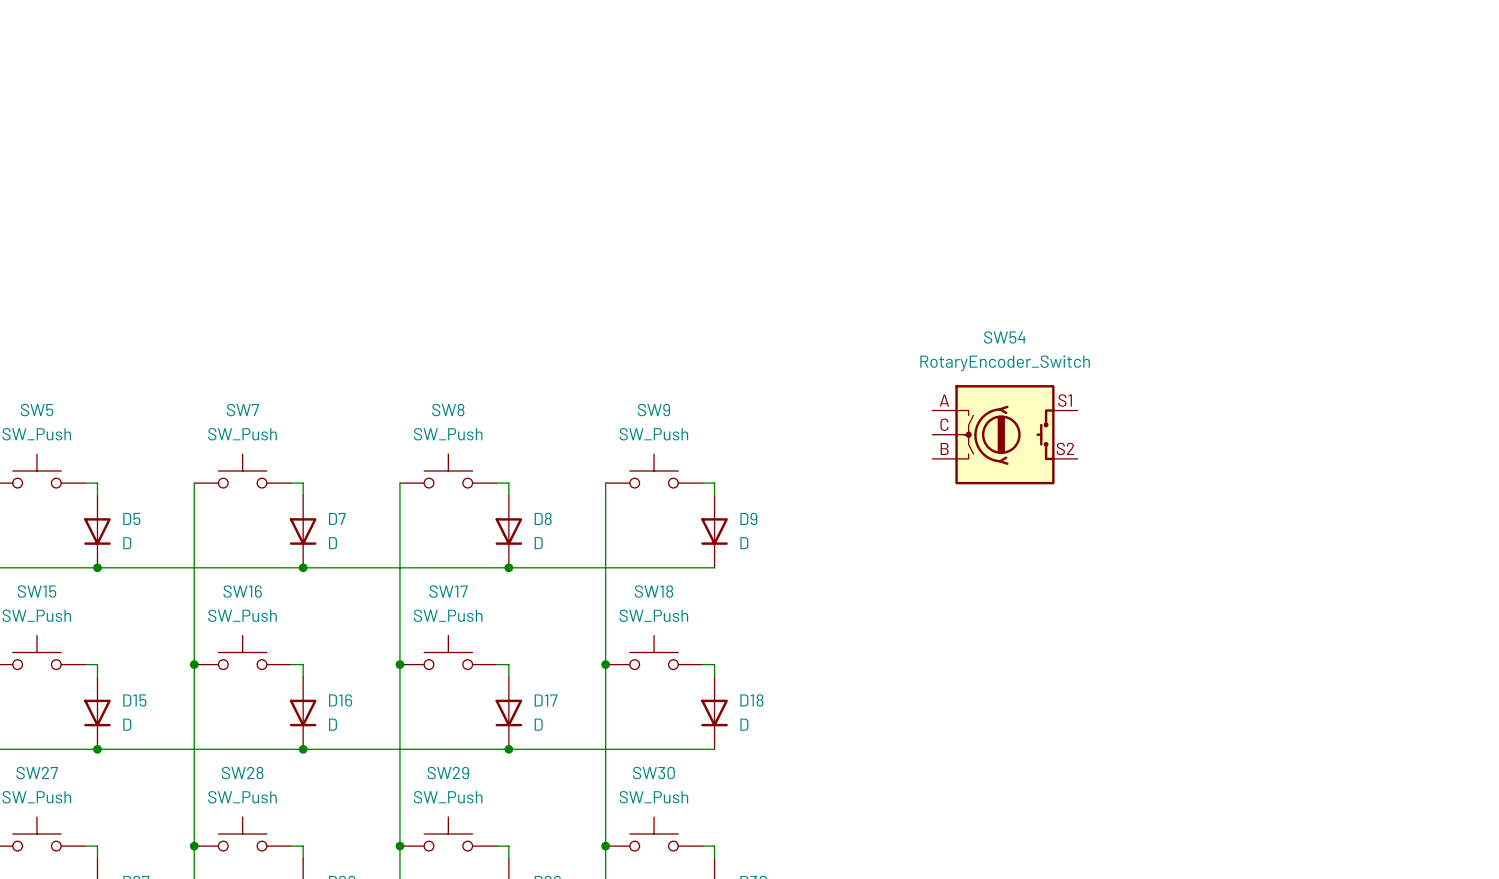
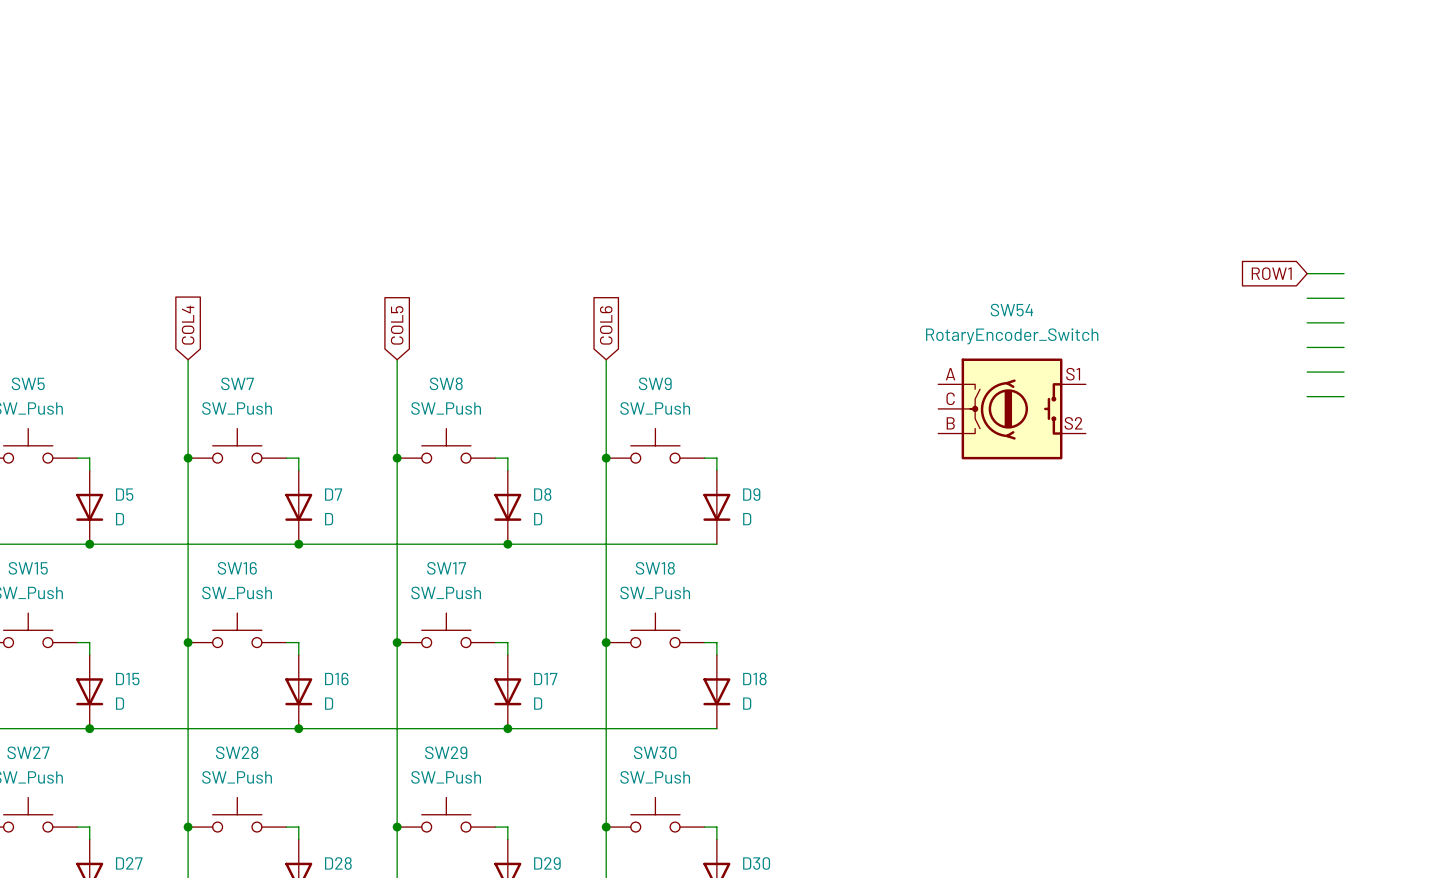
global label: none -> ROW1 (1271, 273)
wire: none -> (1307, 273) (1344, 273)
wire: none -> (1307, 298) (1344, 298)
wire: none -> (1307, 322) (1344, 322)
global label: none -> COL4 (188, 325)
global label: none -> COL5 (397, 325)
global label: none -> COL6 (606, 325)
wire: none -> (1307, 347) (1344, 347)
wire: none -> (188, 359) (188, 458)
wire: none -> (397, 359) (397, 458)
wire: none -> (606, 359) (606, 458)
wire: none -> (1307, 372) (1344, 372)
wire: none -> (1307, 396) (1344, 396)
junction: none -> (188, 458)
junction: none -> (397, 458)
junction: none -> (606, 458)

